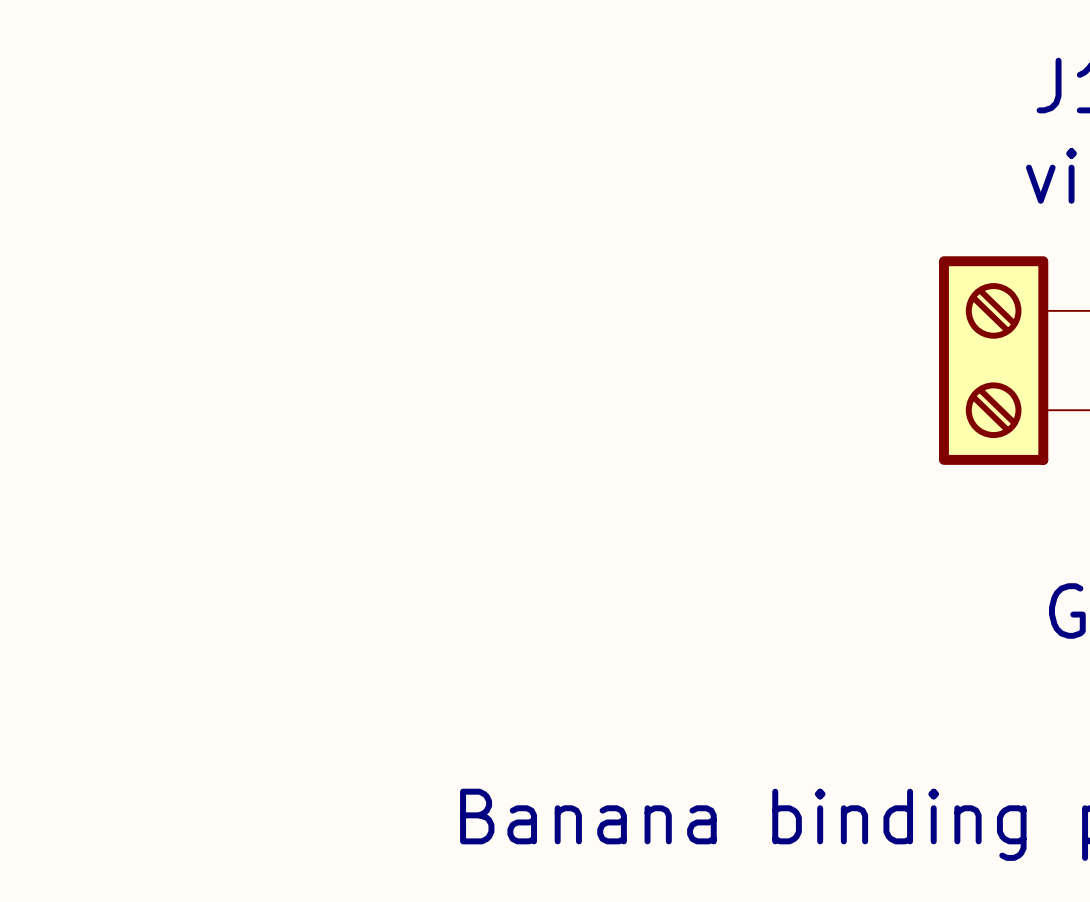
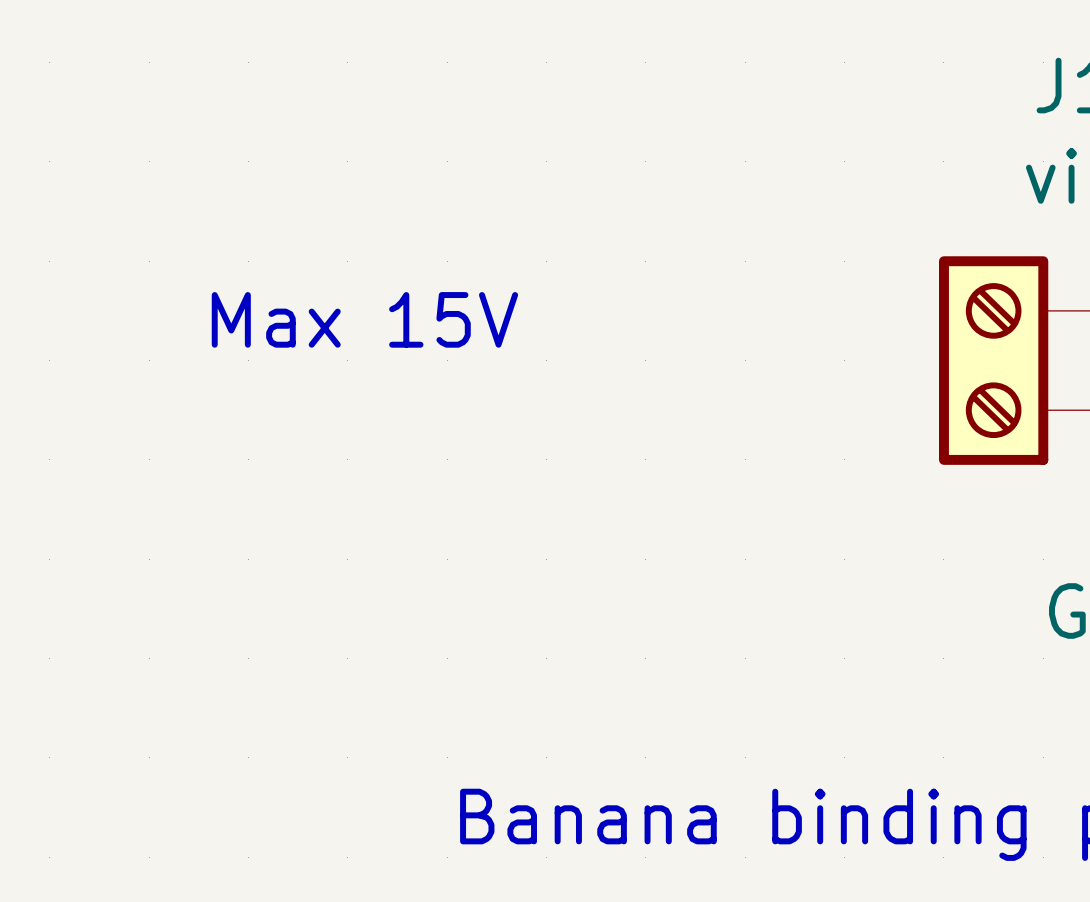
text: none -> Max 15V (364, 319)

